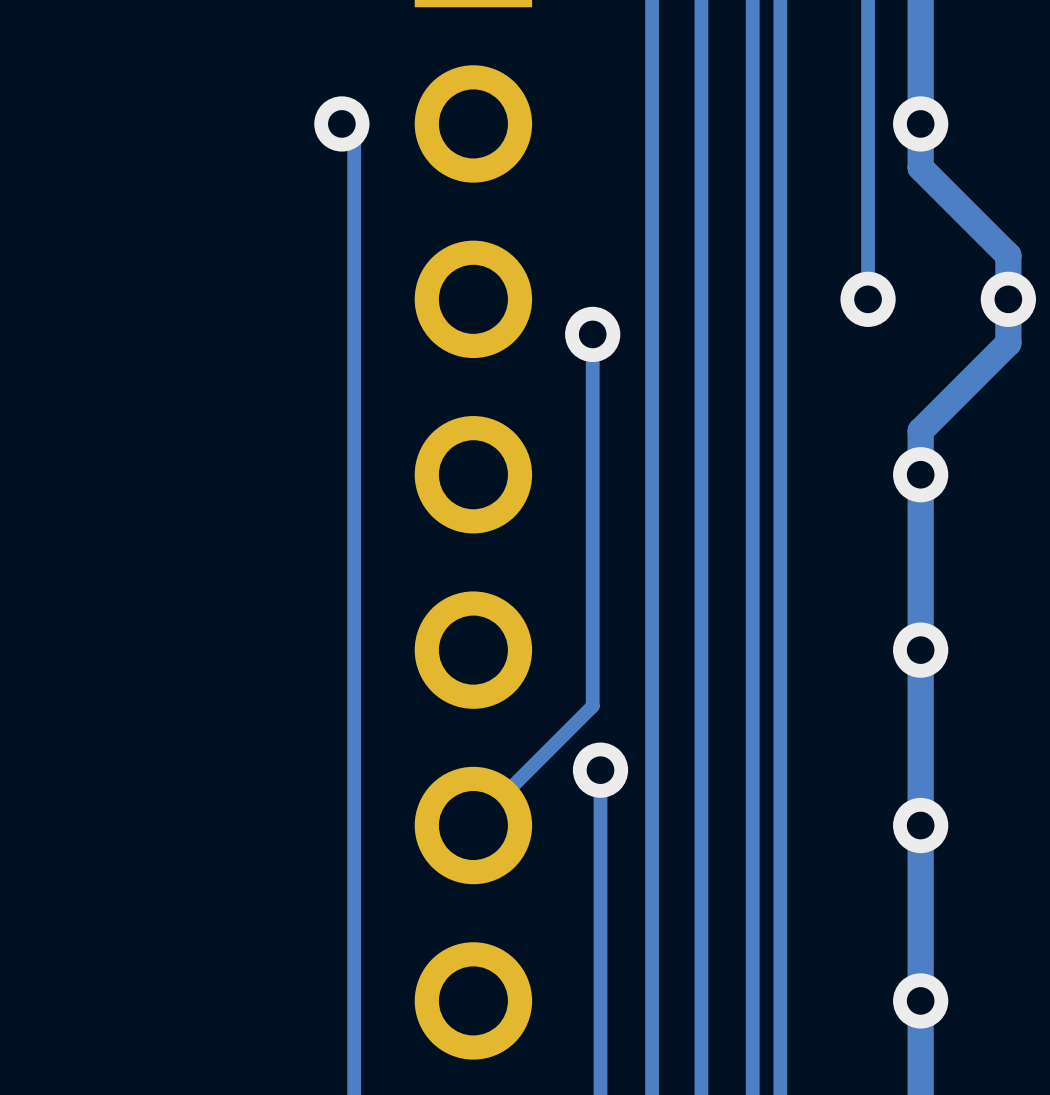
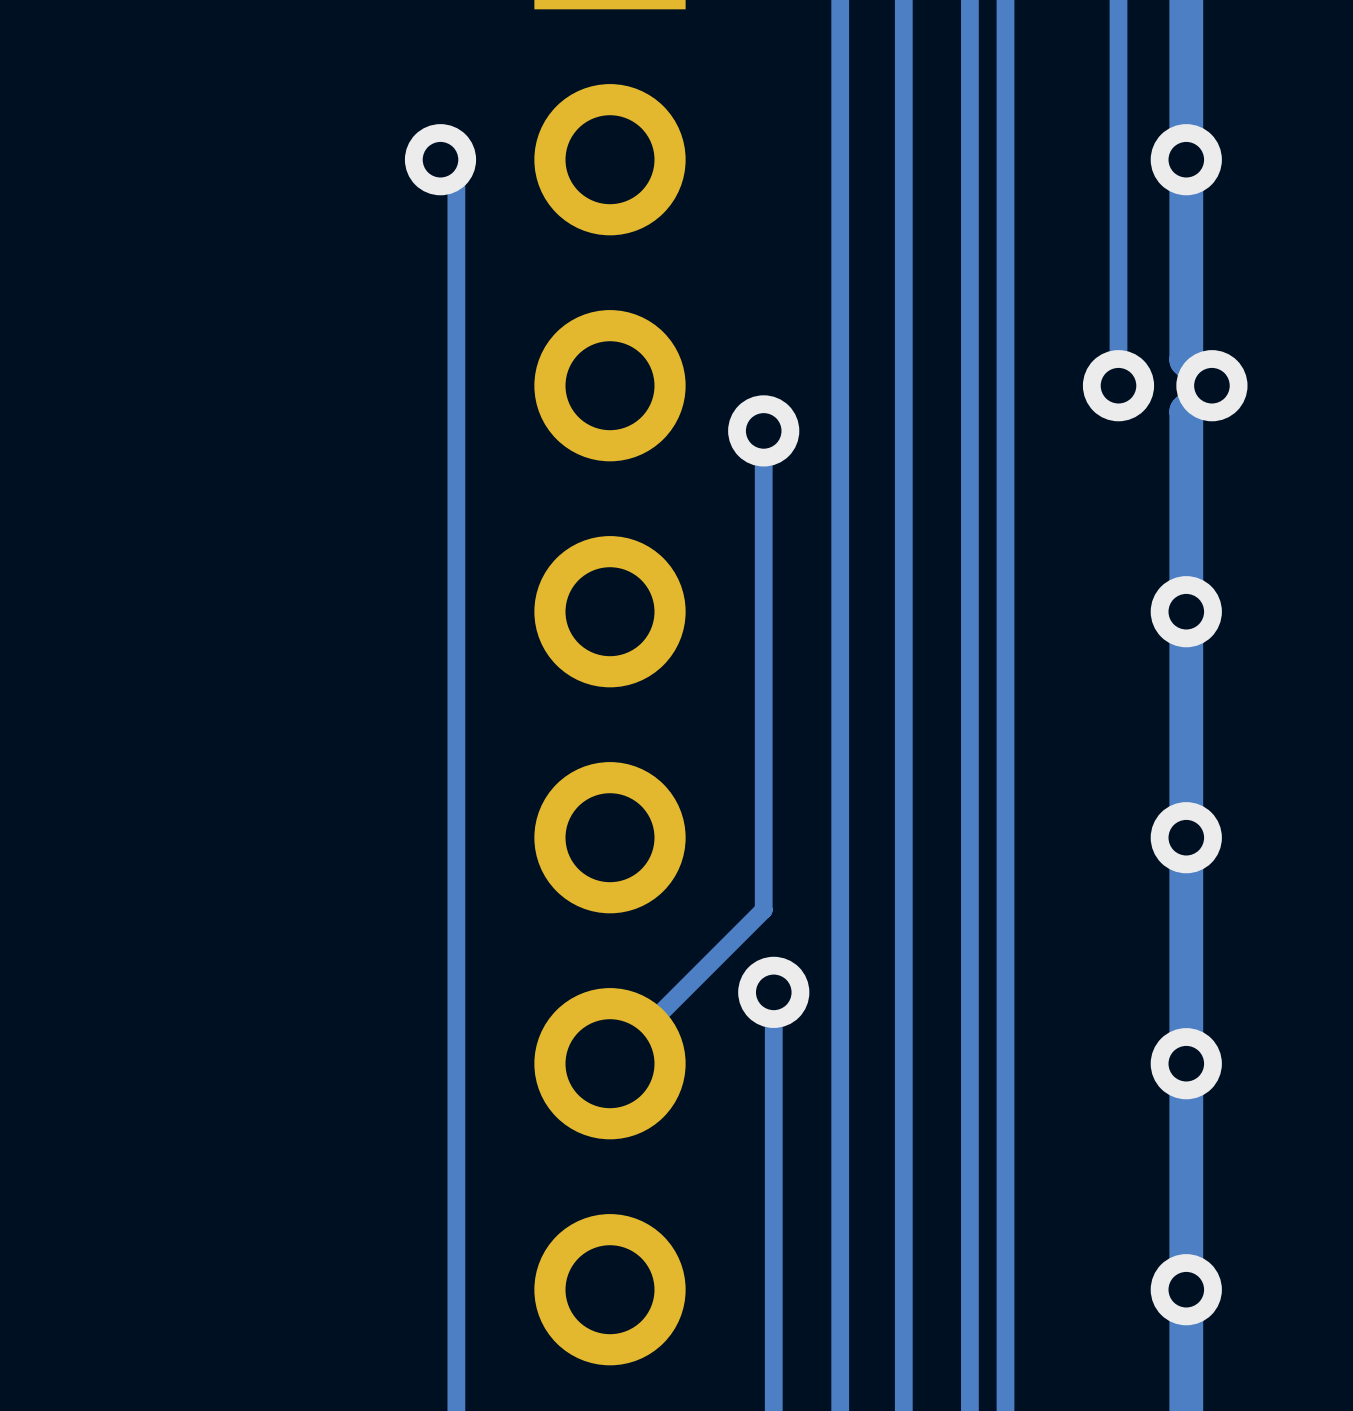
track: (920, 167) (1008, 255) (1008, 343) (920, 430) -> (1186, 216) (1186, 360) (1211, 385) (1186, 411) (1186, 555)
via position: (1008, 299) -> (1211, 385)

